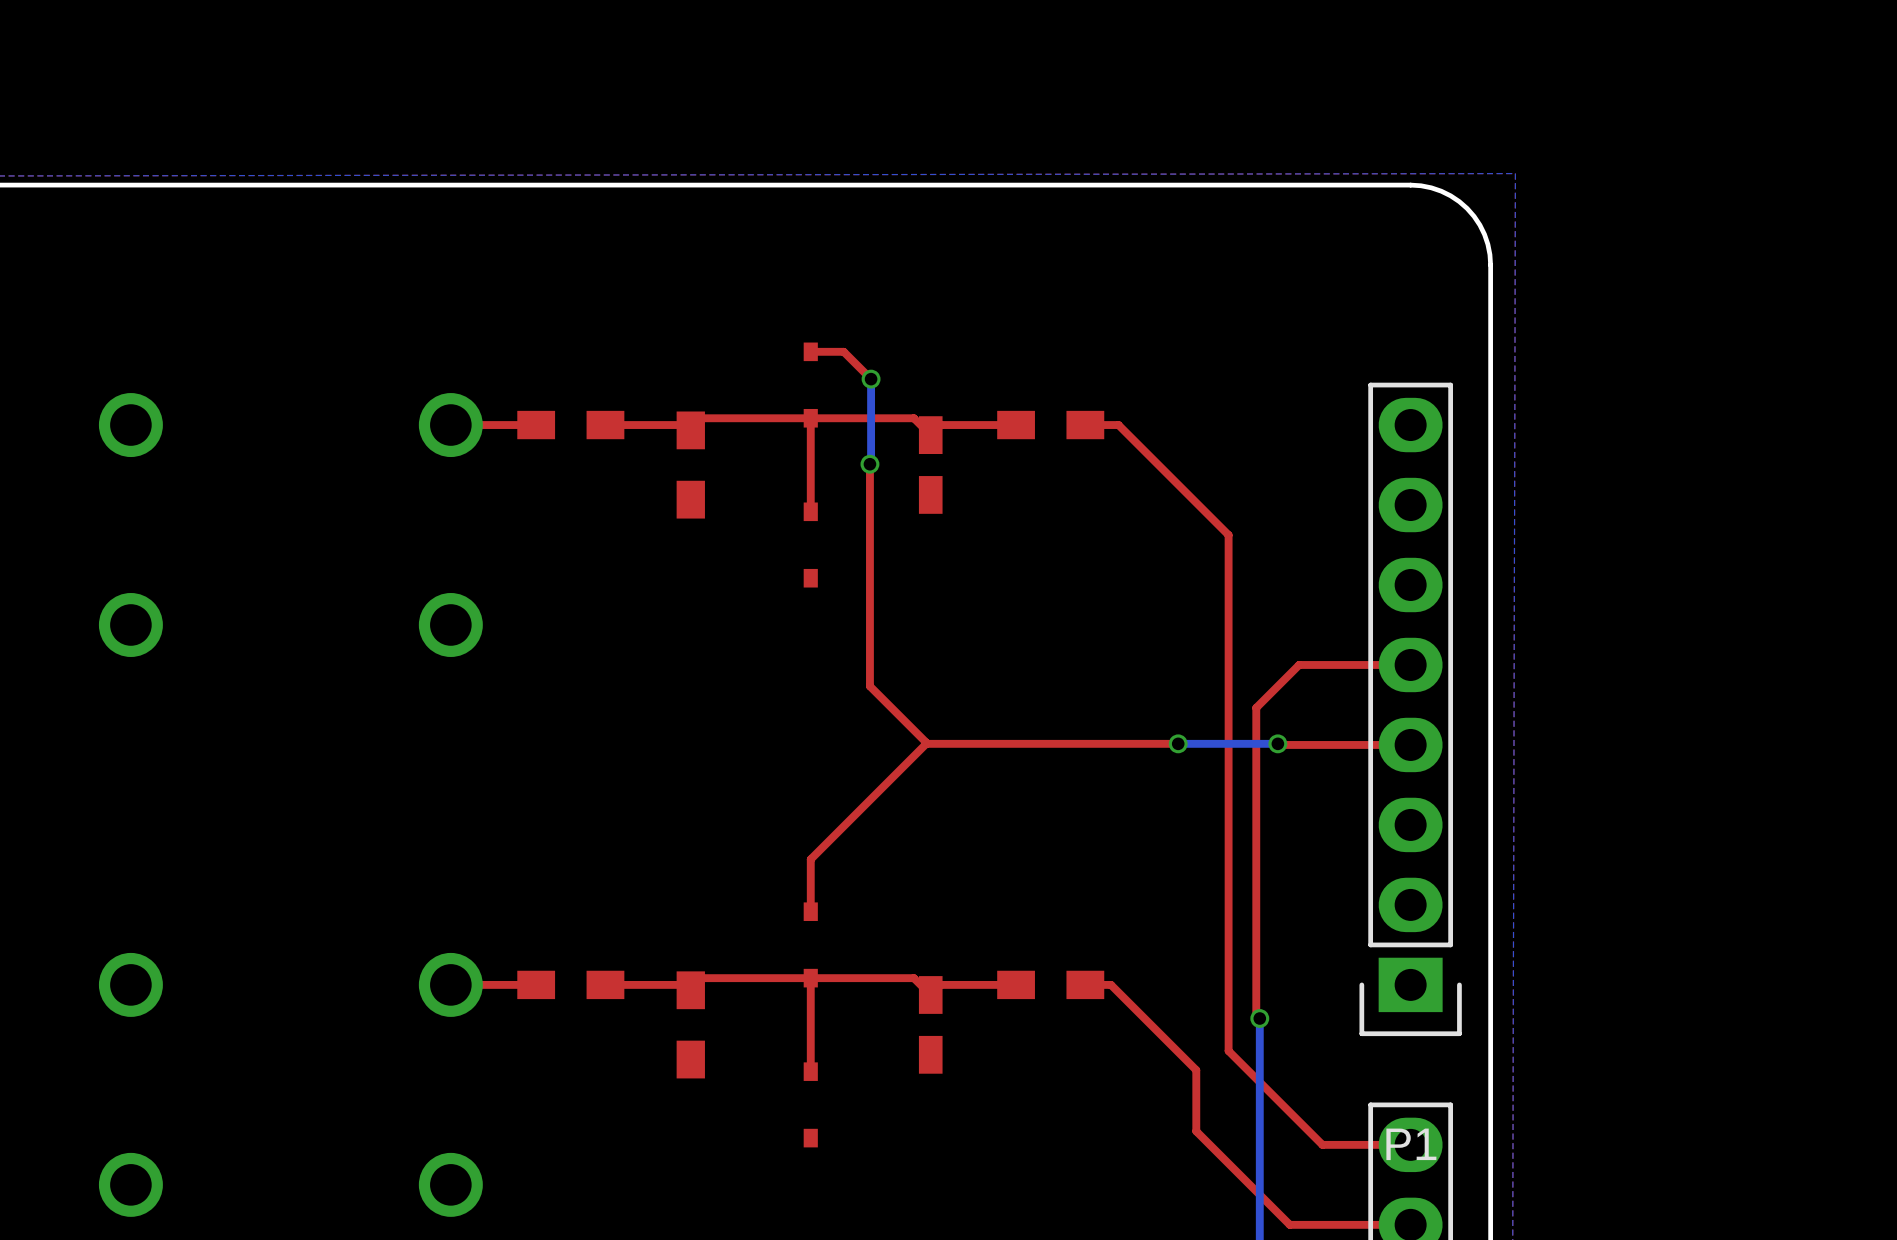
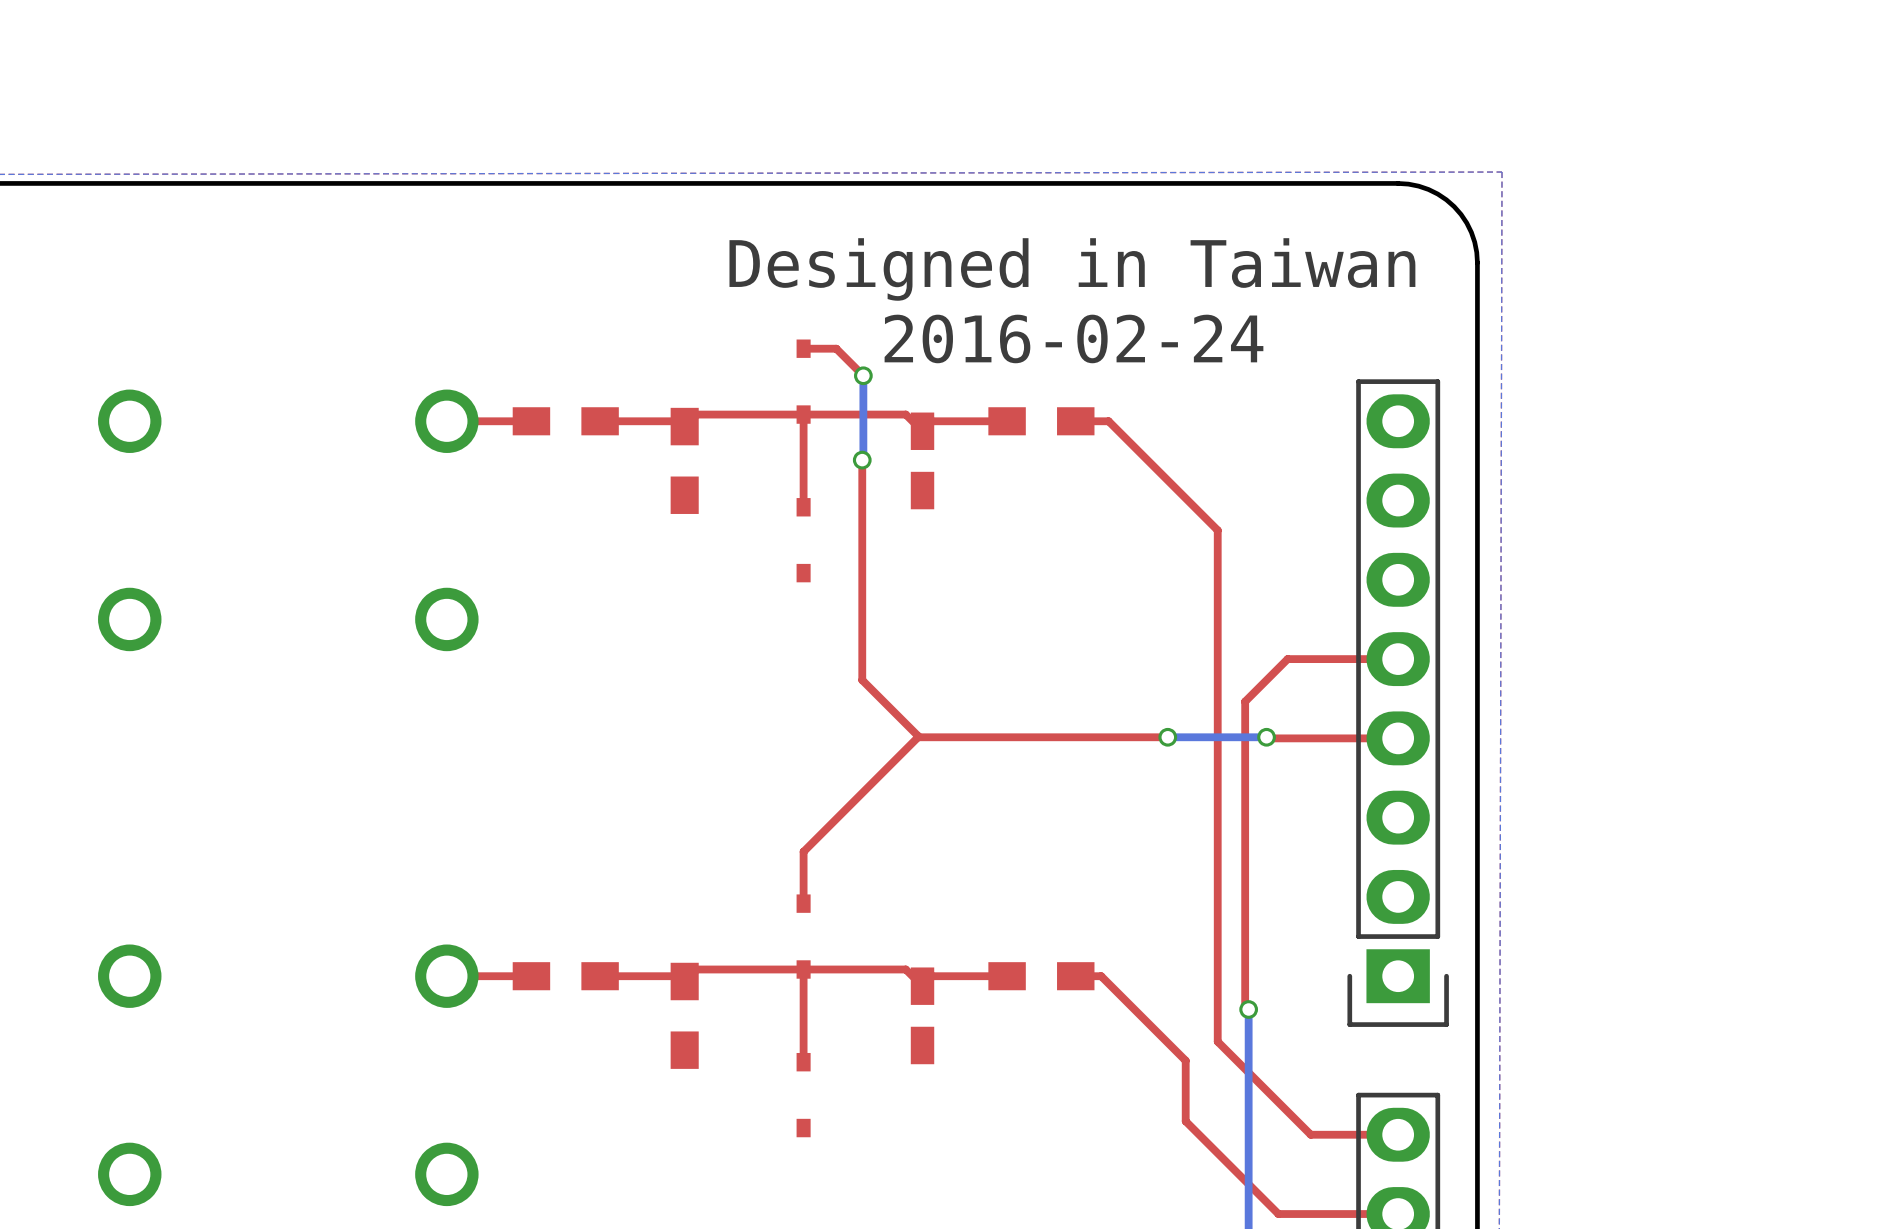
text: none -> Designed in Taiwan (1072, 269)
text: none -> 2016-02-24 (1073, 338)
P1 name: P1 (1411, 1144) -> none

